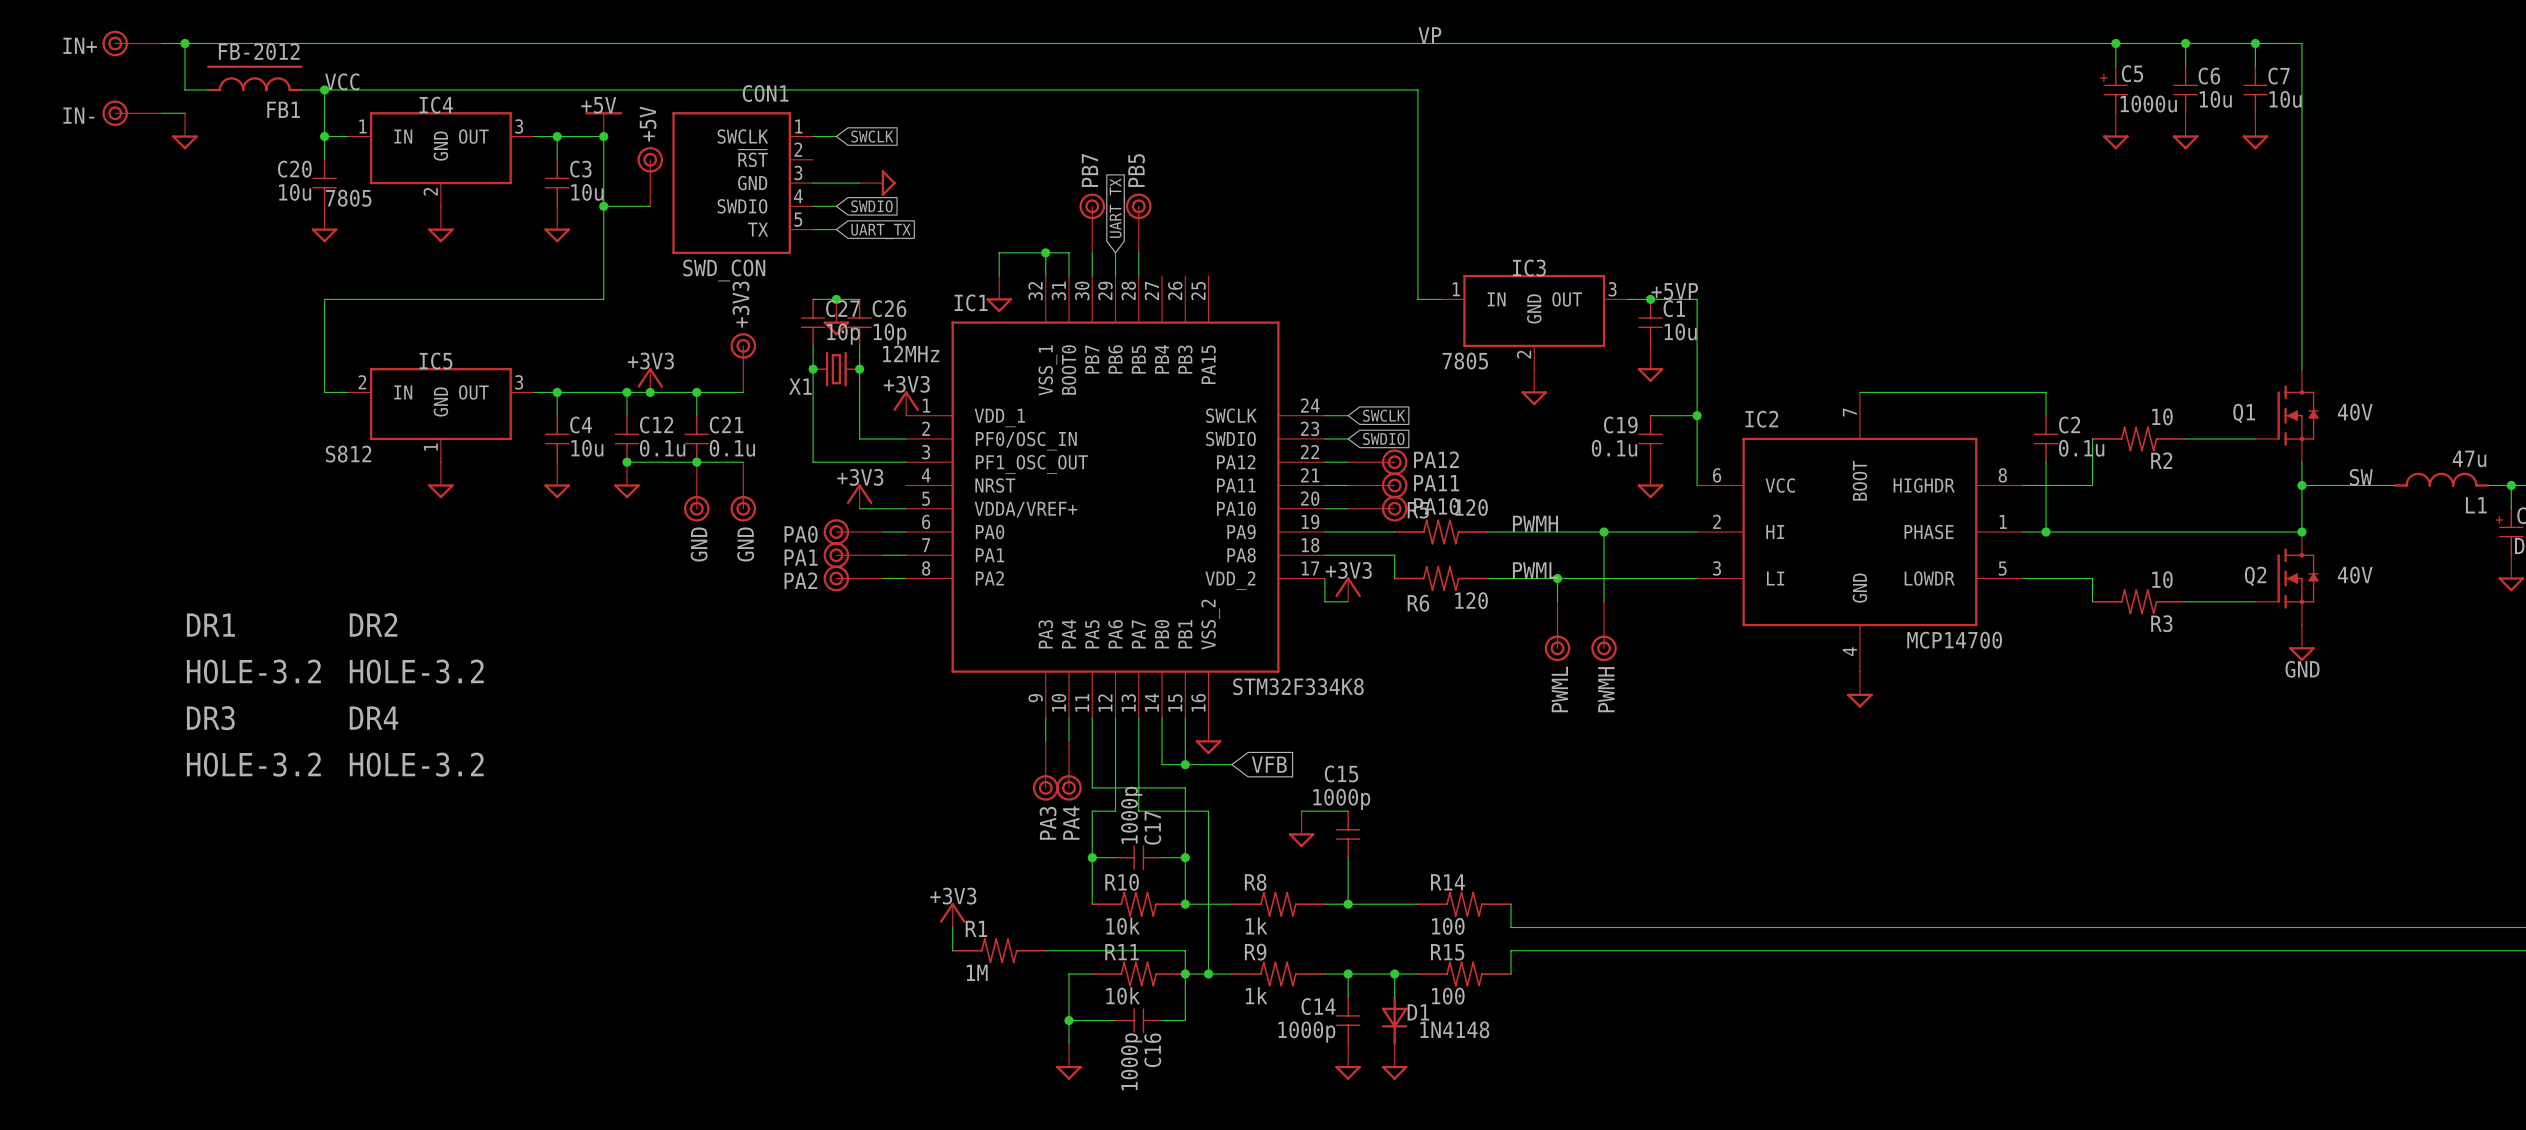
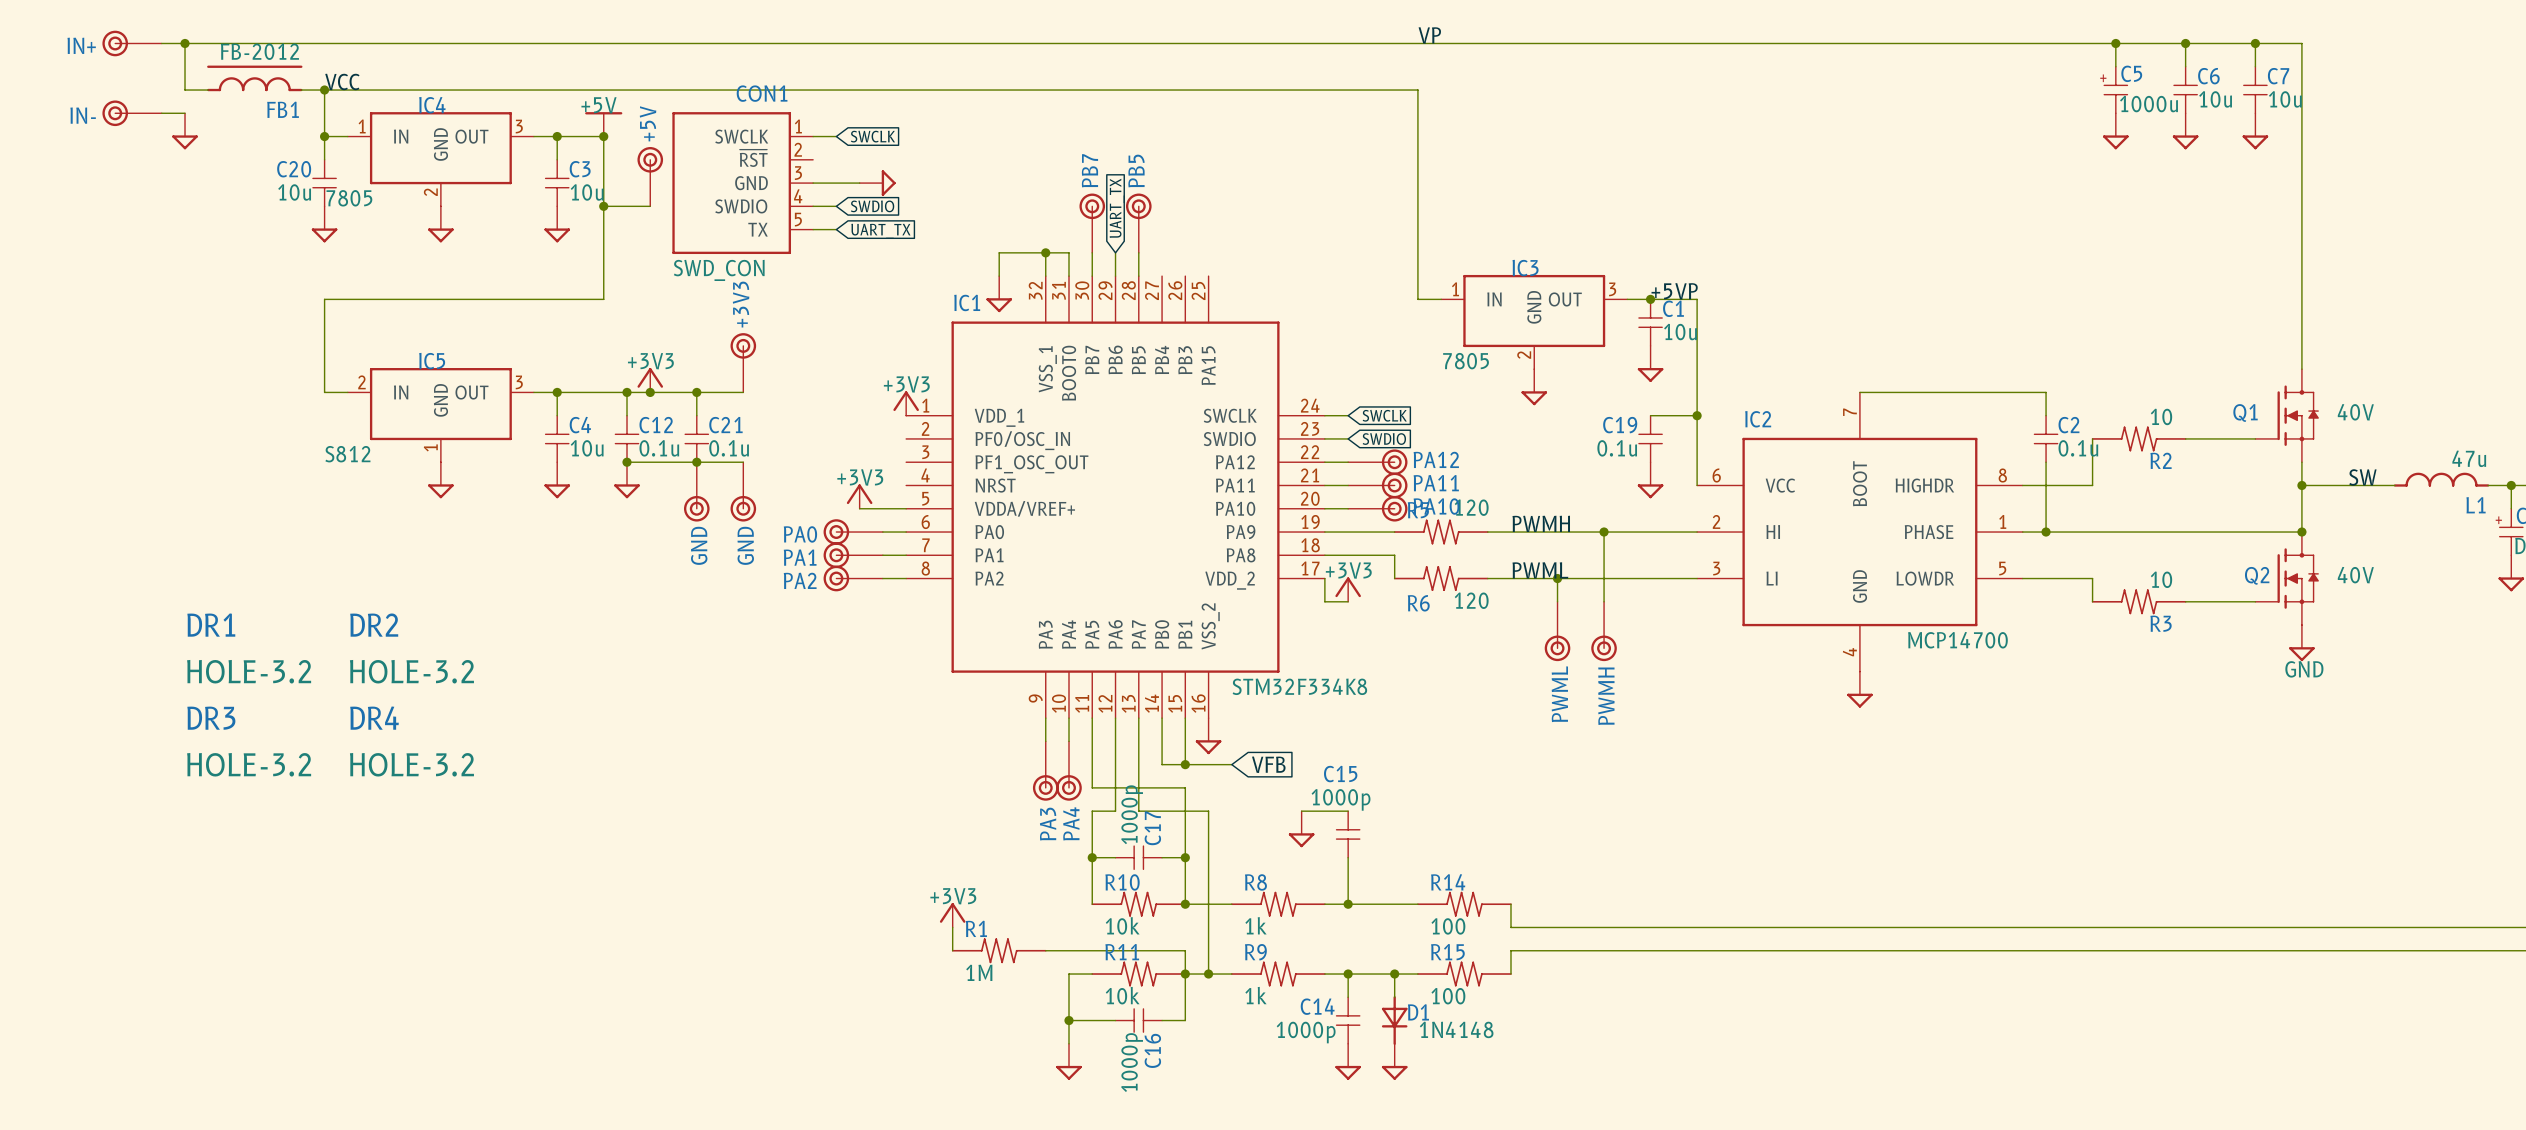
wire: (813, 299) (859, 299) -> none
junction: (836, 299) -> none
power symbol: (836, 317) -> none
C27: 10p (813, 322) -> none
C26: 10p (859, 322) -> none
wire: (813, 345) (813, 462) (906, 462) -> none
wire: (859, 345) (859, 438) (906, 438) -> none
junction: (813, 369) -> none
X1: 12MHz (836, 369) -> none
junction: (859, 369) -> none

